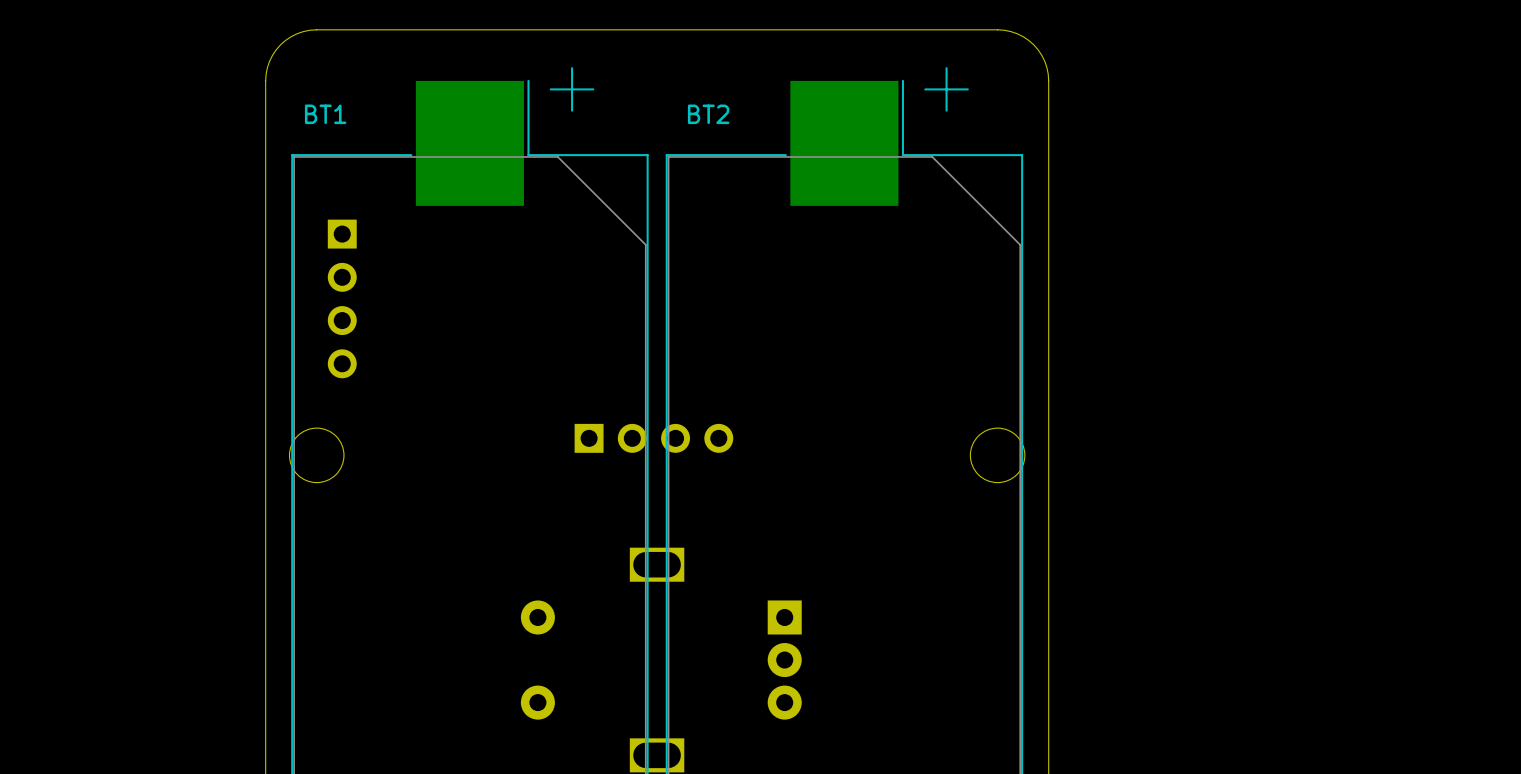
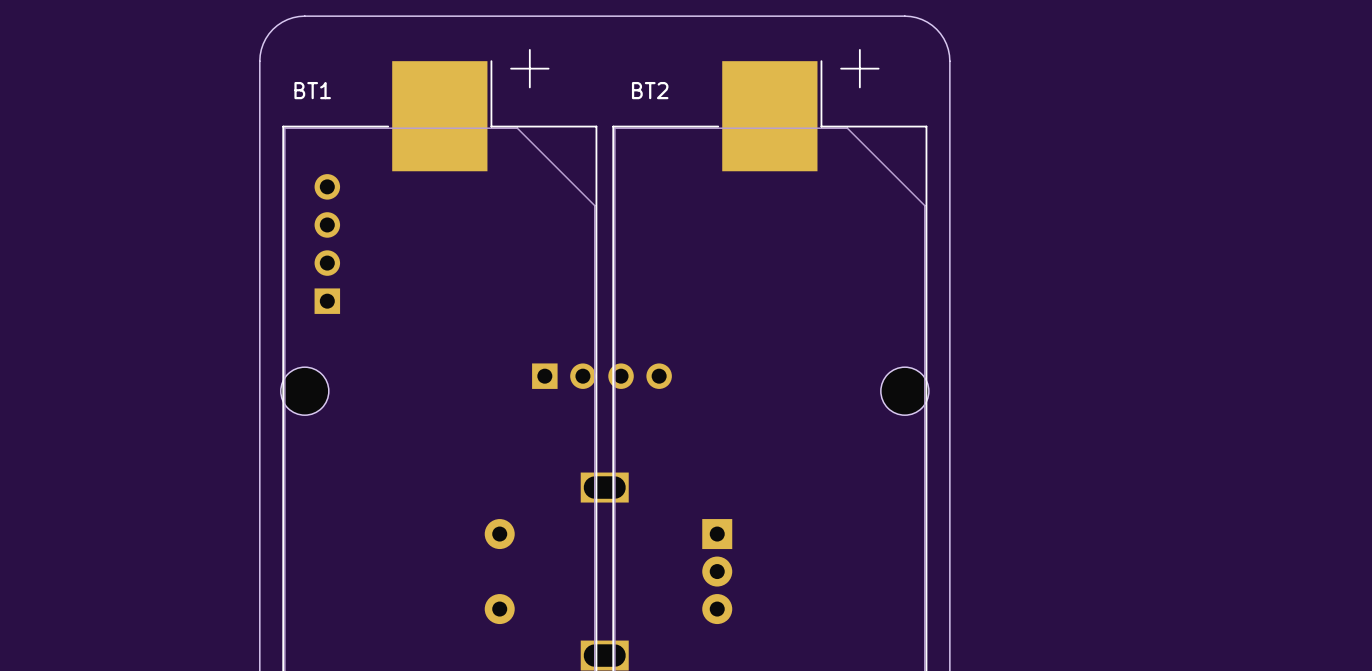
part rotation: 0° (342, 298) -> 180° (327, 244)

